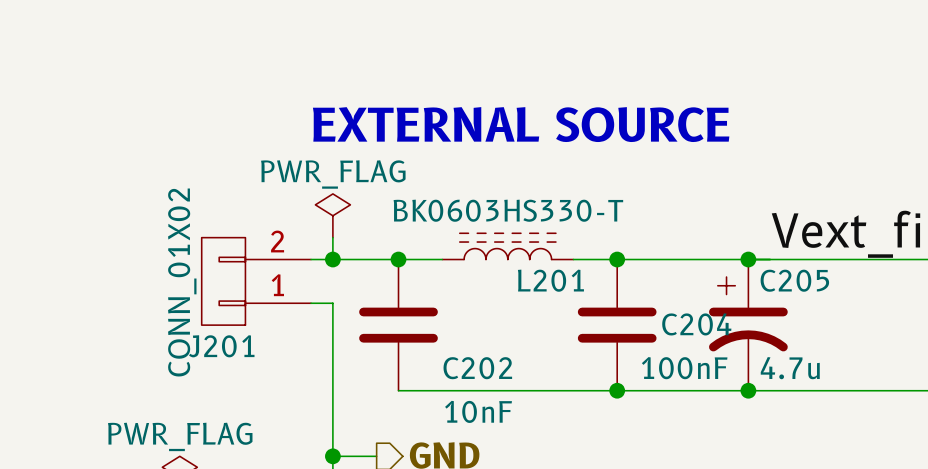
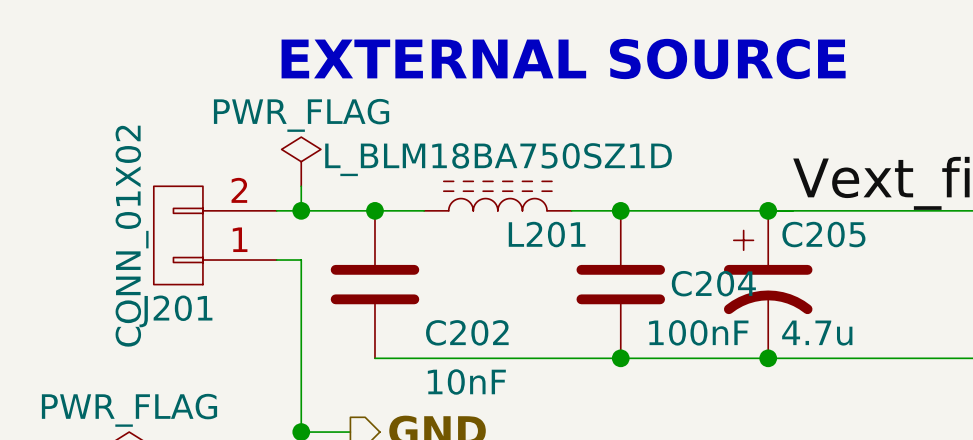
L201 value: BK0603HS330-T (508, 210) -> L_BLM18BA750SZ1D (498, 159)

